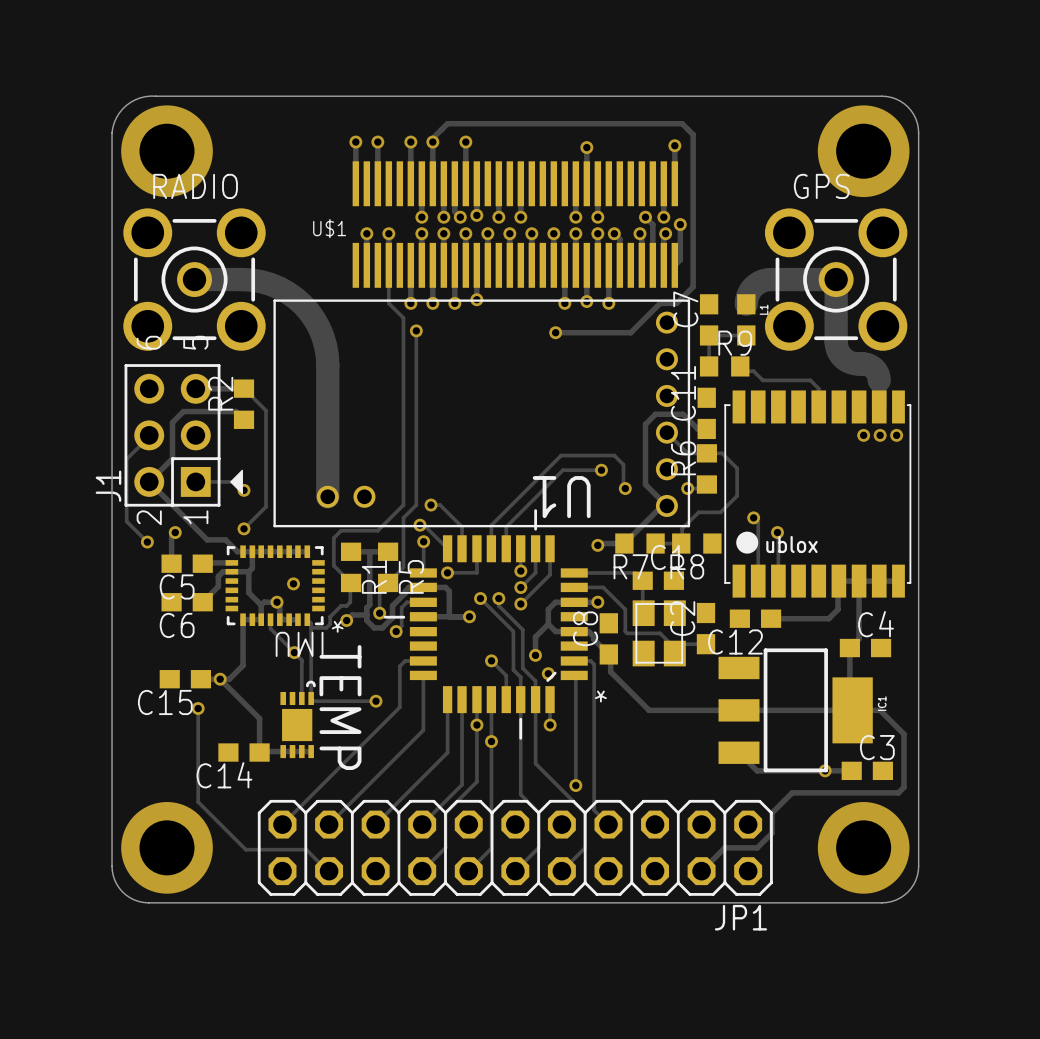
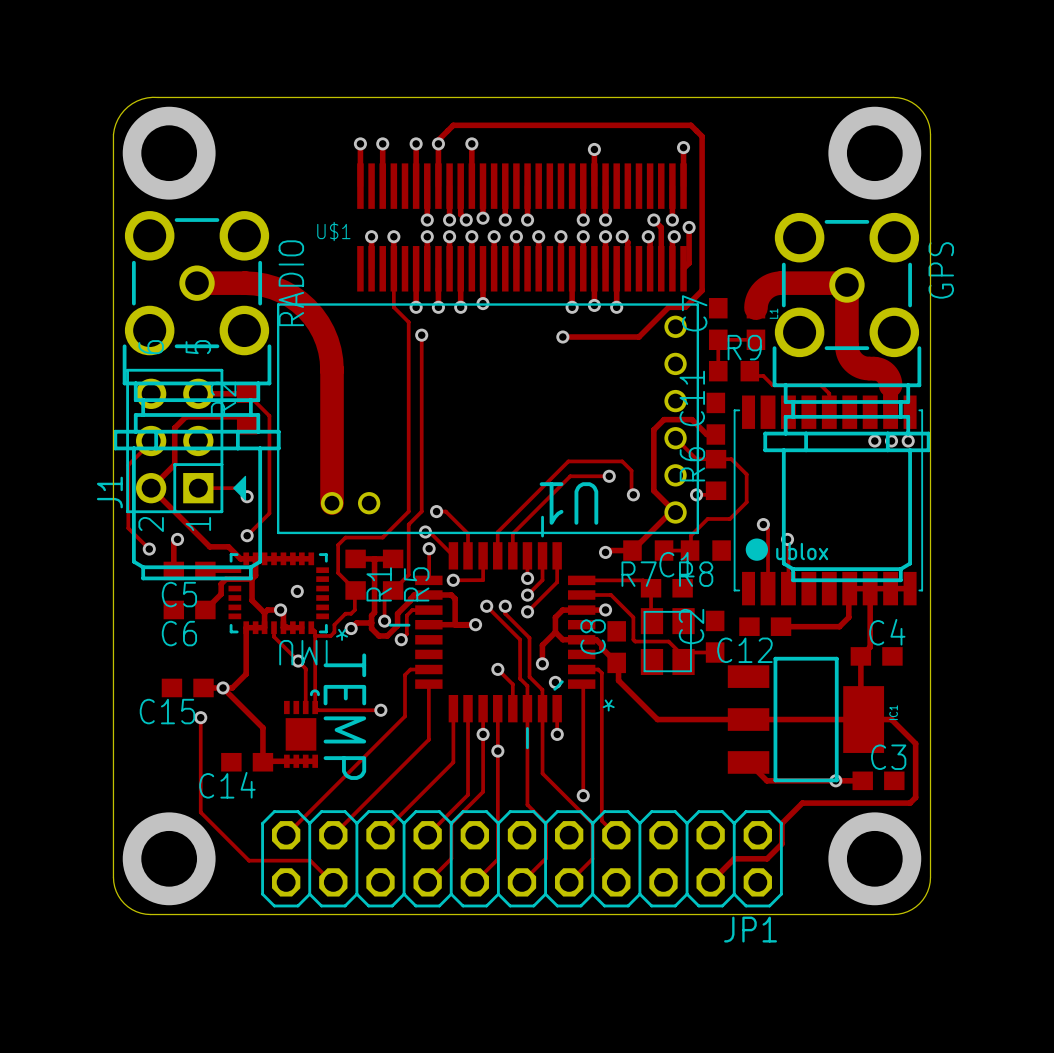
RADIO: (194, 279) -> none
GPS: (836, 279) -> none
RADIO: none -> (197, 395)
GPS: none -> (846, 397)

